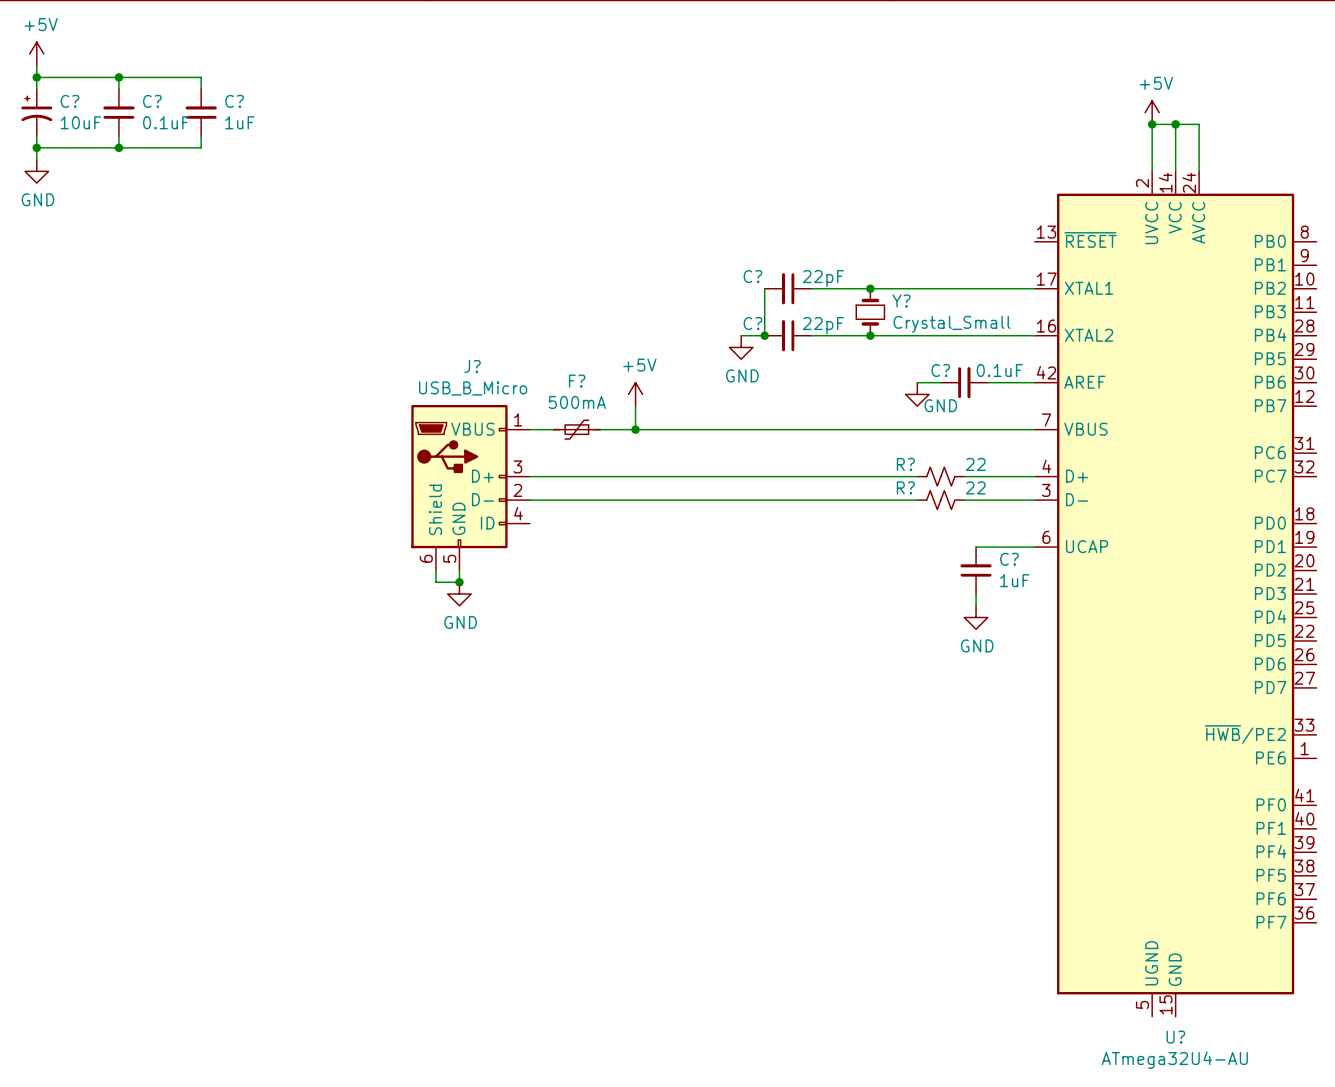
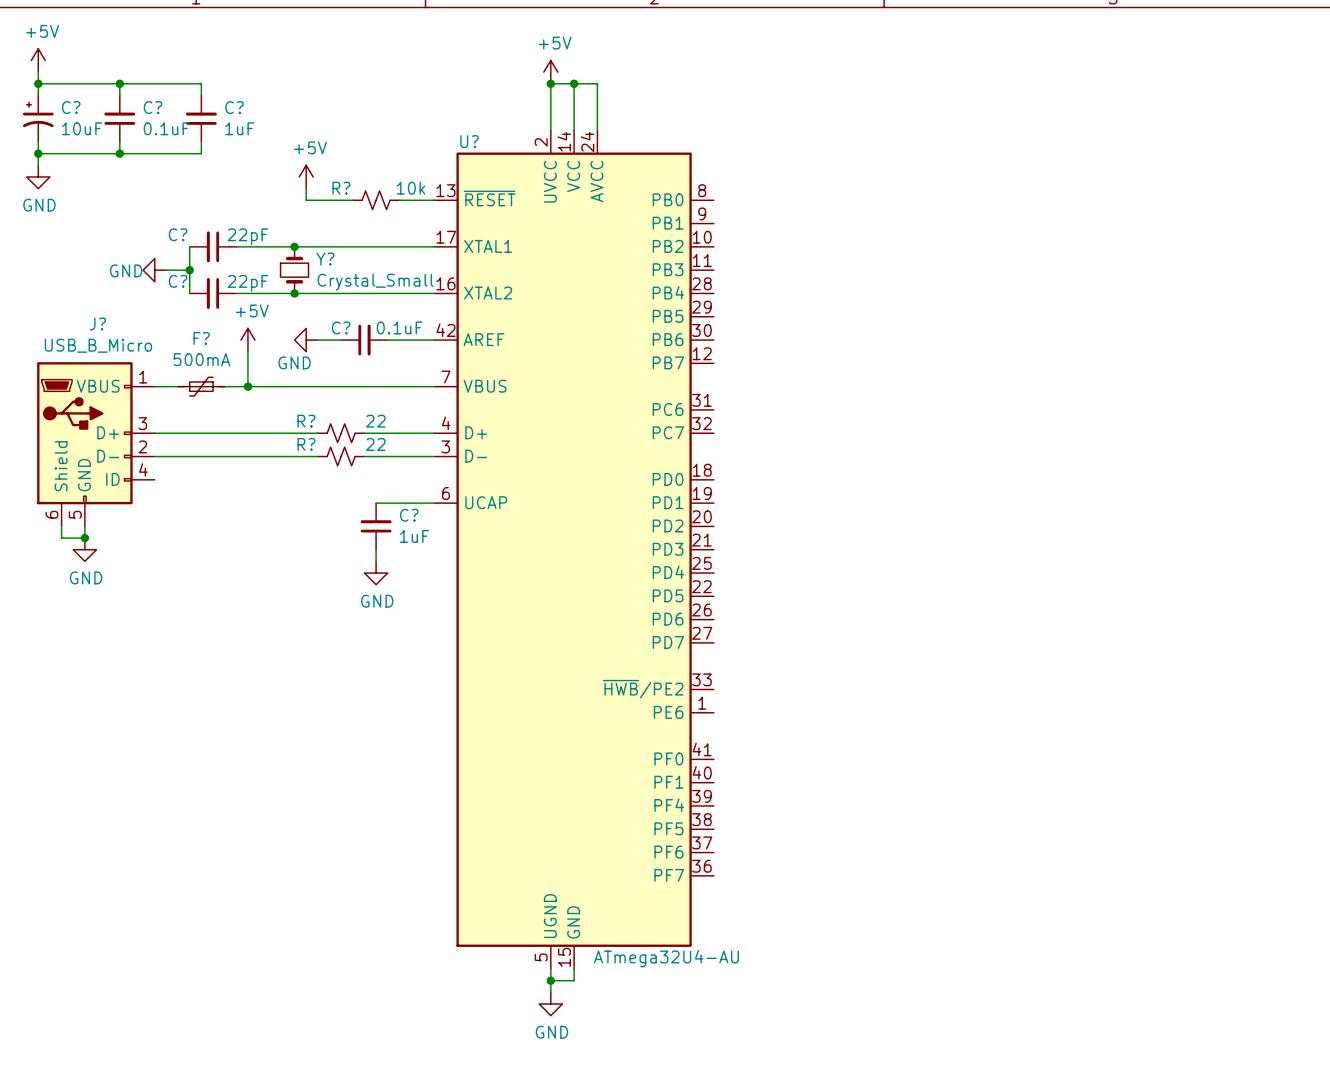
power symbol: none -> +5V (550, 72)
junction: none -> (550, 83)
wire: none -> (574, 83) (574, 130)
junction: none -> (574, 83)
power symbol: +5V (1152, 112) -> none
wire: none -> (550, 130) (550, 83) (597, 83) (597, 130)
junction: (1152, 124) -> none
wire: (1175, 124) (1175, 171) -> none
junction: (1175, 124) -> none
power symbol: none -> +5V (306, 176)
wire: (1152, 171) (1152, 124) (1199, 124) (1199, 171) -> none
wire: none -> (306, 188) (306, 200) (352, 200)
R?: none -> 10k (376, 200)
wire: none -> (399, 200) (434, 200)
wire: none -> (189, 246) (189, 293)
C?: none -> 22pF (213, 246)
wire: none -> (236, 246) (434, 246)
junction: none -> (294, 246)
power symbol: none -> GND (154, 270)
wire: none -> (166, 270) (189, 270)
junction: none -> (189, 270)
Y?: none -> Crystal_Small (294, 270)
C?: none -> 22pF (213, 293)
wire: none -> (236, 293) (434, 293)
junction: none -> (294, 293)
wire: (764, 288) (764, 335) (741, 335) -> none
C?: 22pF (788, 288) -> none
wire: (811, 288) (1034, 288) -> none
junction: (870, 288) -> none
Y?: Crystal_Small (870, 312) -> none
power symbol: none -> +5V (247, 340)
power symbol: none -> GND (306, 340)
wire: none -> (317, 340) (341, 340)
C?: none -> 0.1uF (364, 340)
wire: none -> (387, 340) (434, 340)
junction: (764, 335) -> none
C?: 22pF (788, 335) -> none
wire: (811, 335) (1034, 335) -> none
junction: (870, 335) -> none
wire: none -> (247, 351) (247, 386)
power symbol: GND (741, 347) -> none
wire: none -> (154, 386) (178, 386)
F?: none -> 500mA (201, 386)
wire: none -> (224, 386) (434, 386)
junction: none -> (247, 386)
wire: (917, 382) (940, 382) -> none
C?: 0.1uF (964, 382) -> none
wire: (987, 382) (1034, 382) -> none
power symbol: +5V (635, 394) -> none
power symbol: GND (917, 394) -> none
wire: none -> (154, 433) (317, 433)
R?: none -> 22 (341, 433)
wire: none -> (364, 433) (434, 433)
F?: 500mA (576, 429) -> none
wire: (600, 429) (1034, 429) -> none
junction: (635, 429) -> none
J?: none -> USB_B_Micro (95, 444)
wire: none -> (154, 456) (317, 456)
R?: none -> 22 (341, 456)
wire: none -> (364, 456) (434, 456)
wire: (529, 476) (917, 476) -> none
R?: 22 (940, 476) -> none
wire: (964, 476) (1034, 476) -> none
J?: USB_B_Micro (470, 487) -> none
wire: none -> (376, 503) (434, 503)
wire: (529, 500) (917, 500) -> none
R?: 22 (940, 500) -> none
wire: (964, 500) (1034, 500) -> none
wire: none -> (61, 526) (61, 538) (84, 538) (84, 526)
C?: none -> 1uF (376, 526)
junction: none -> (84, 538)
power symbol: none -> GND (84, 549)
wire: none -> (376, 549) (376, 561)
U?: none -> ATmega32U4-AU (574, 549)
wire: (976, 547) (1034, 547) -> none
wire: (435, 570) (435, 582) (459, 582) (459, 570) -> none
C?: 1uF (976, 570) -> none
junction: (459, 582) -> none
power symbol position: GND (459, 594) -> GND (376, 573)
wire: (976, 594) (976, 605) -> none
U?: ATmega32U4-AU (1175, 594) -> none
power symbol: GND (976, 617) -> none
wire: none -> (550, 969) (550, 992)
wire: none -> (574, 969) (574, 980) (550, 980)
junction: none -> (550, 980)
power symbol: none -> GND (550, 1003)

